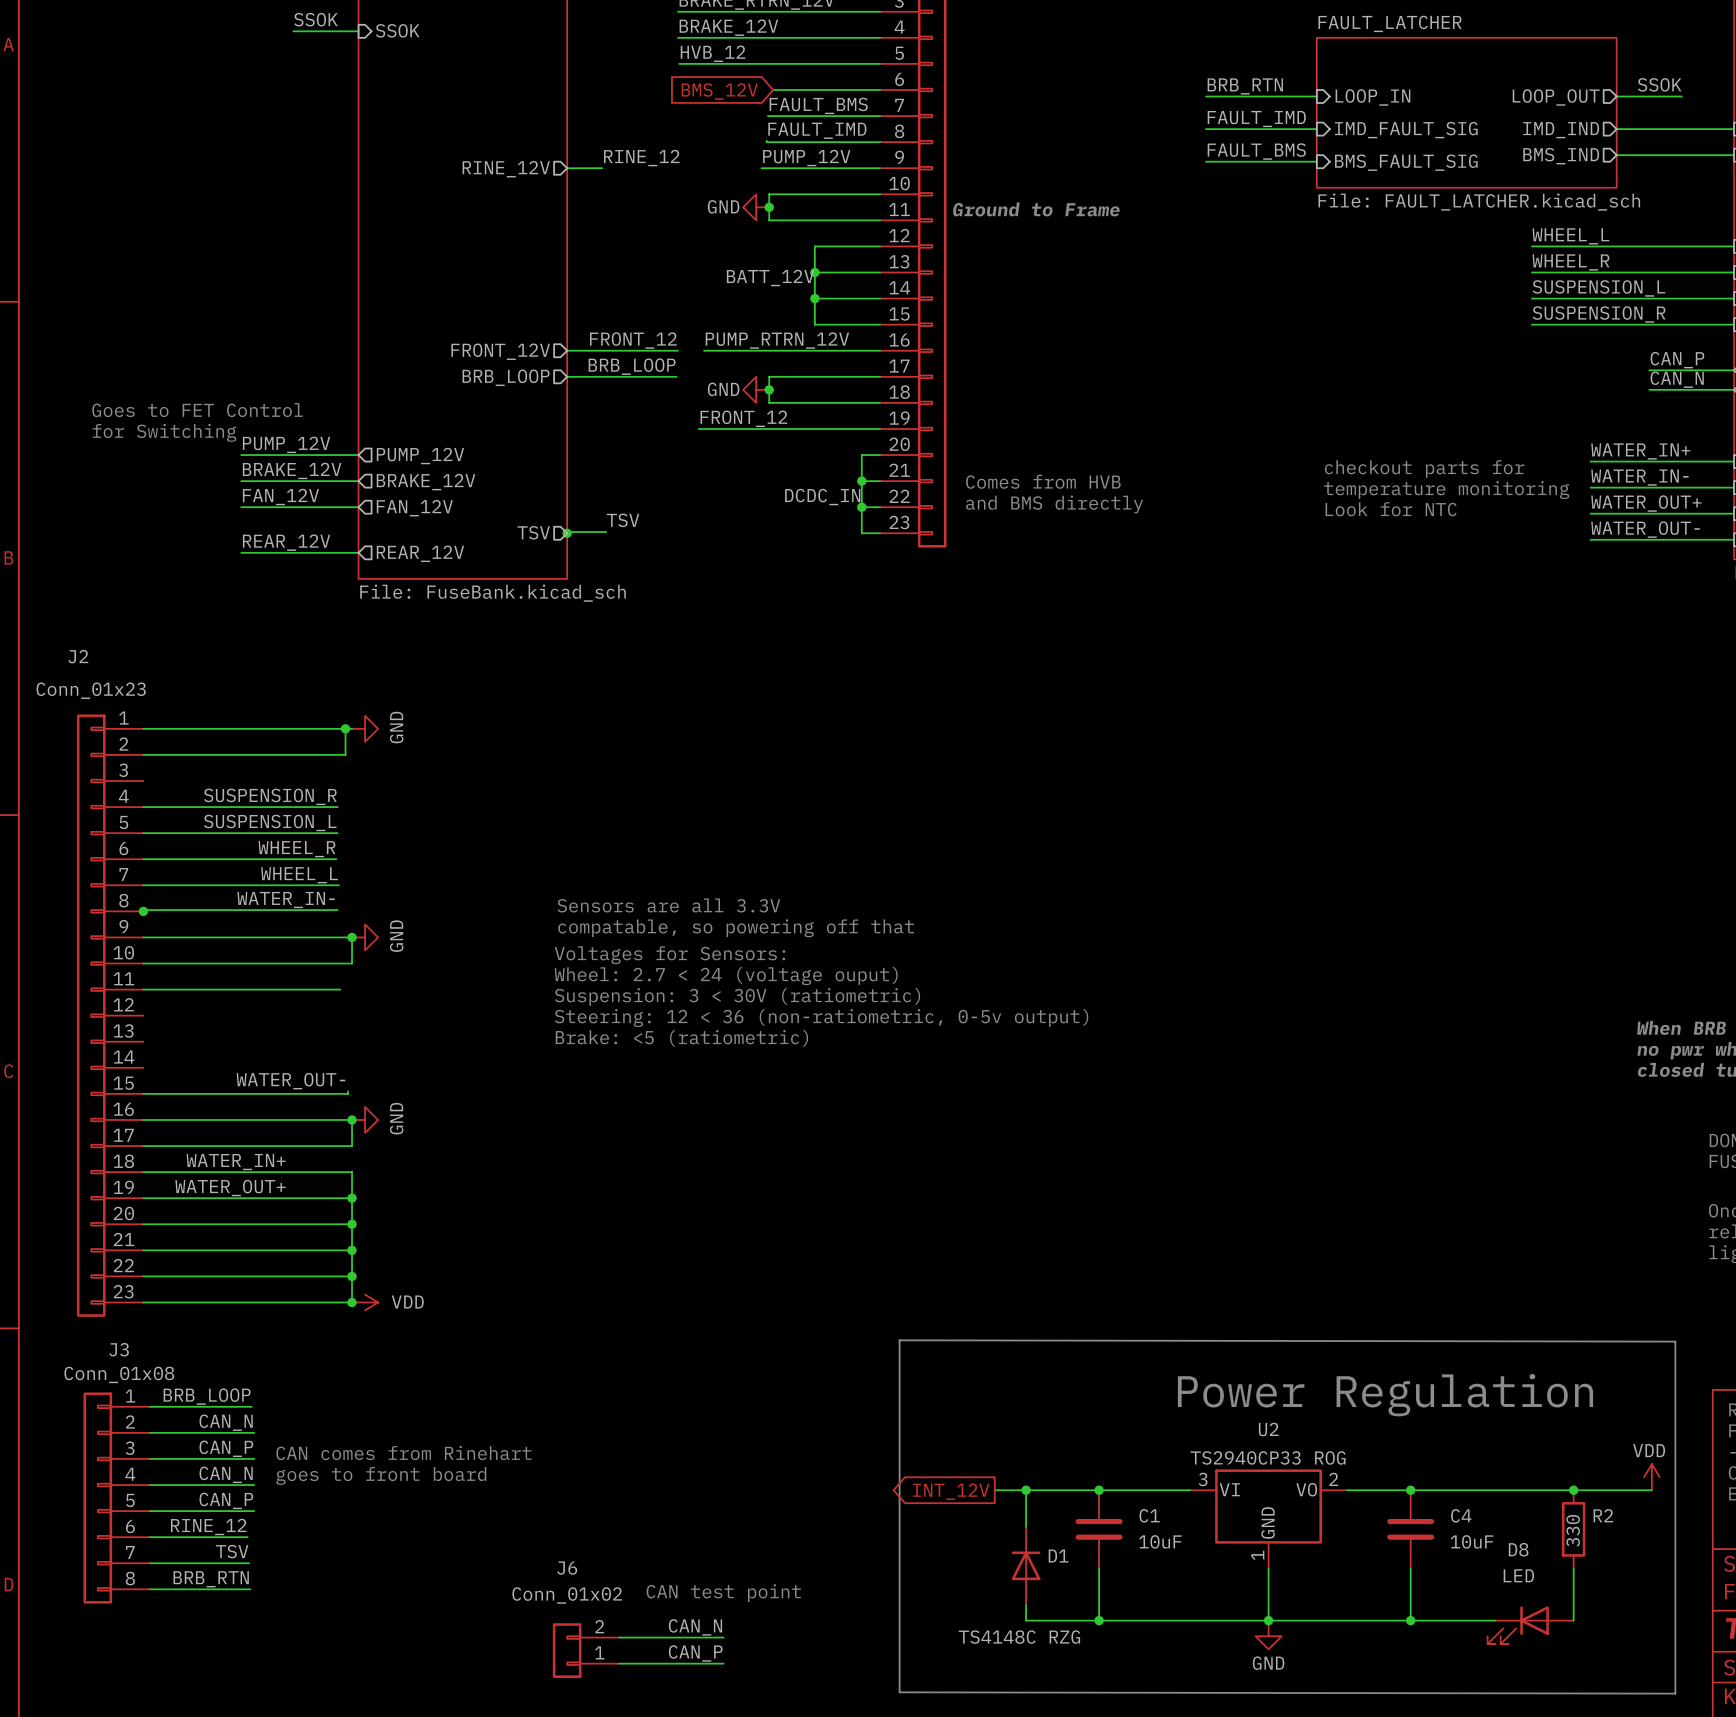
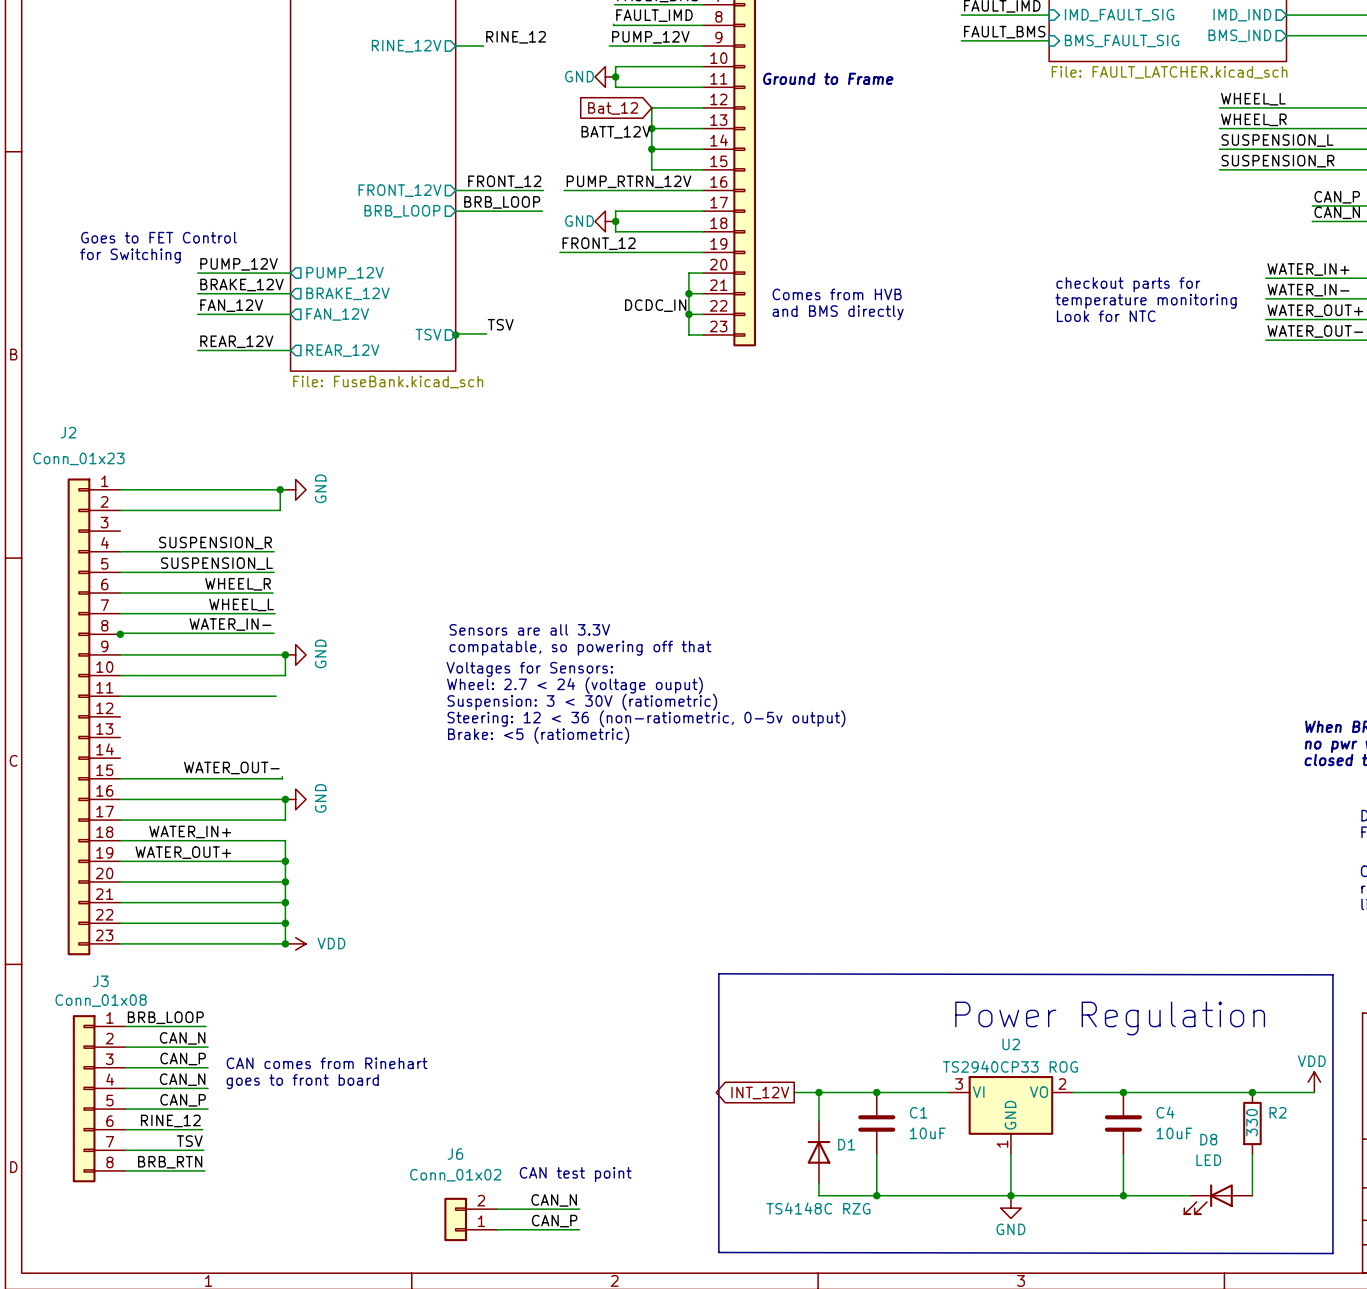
global label: none -> Bat_12 (613, 108)

